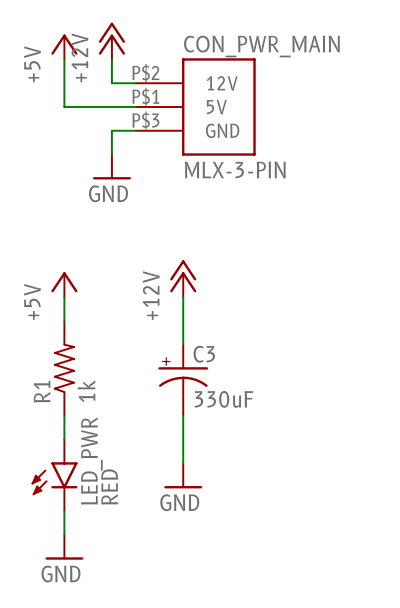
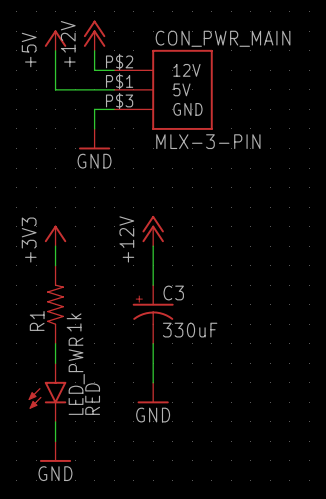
power symbol: +5V (64, 284) -> +3V3 (55, 235)

